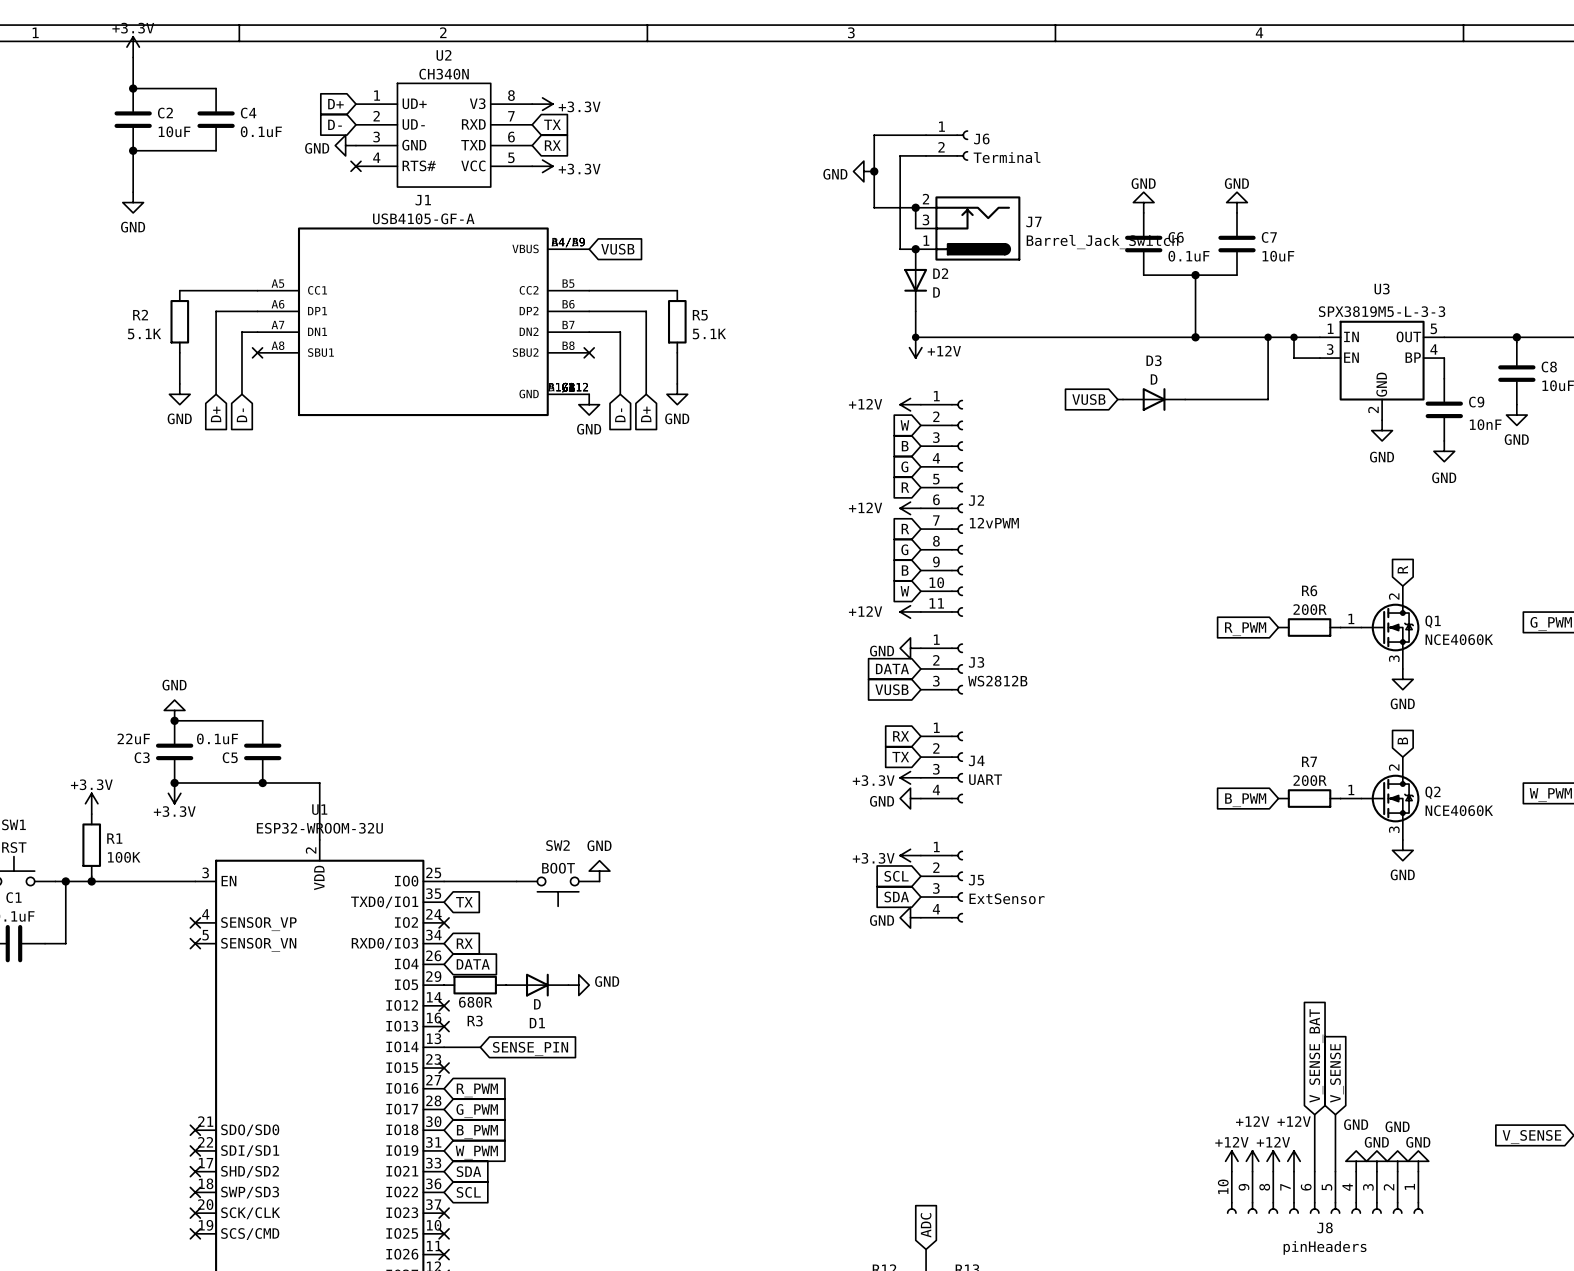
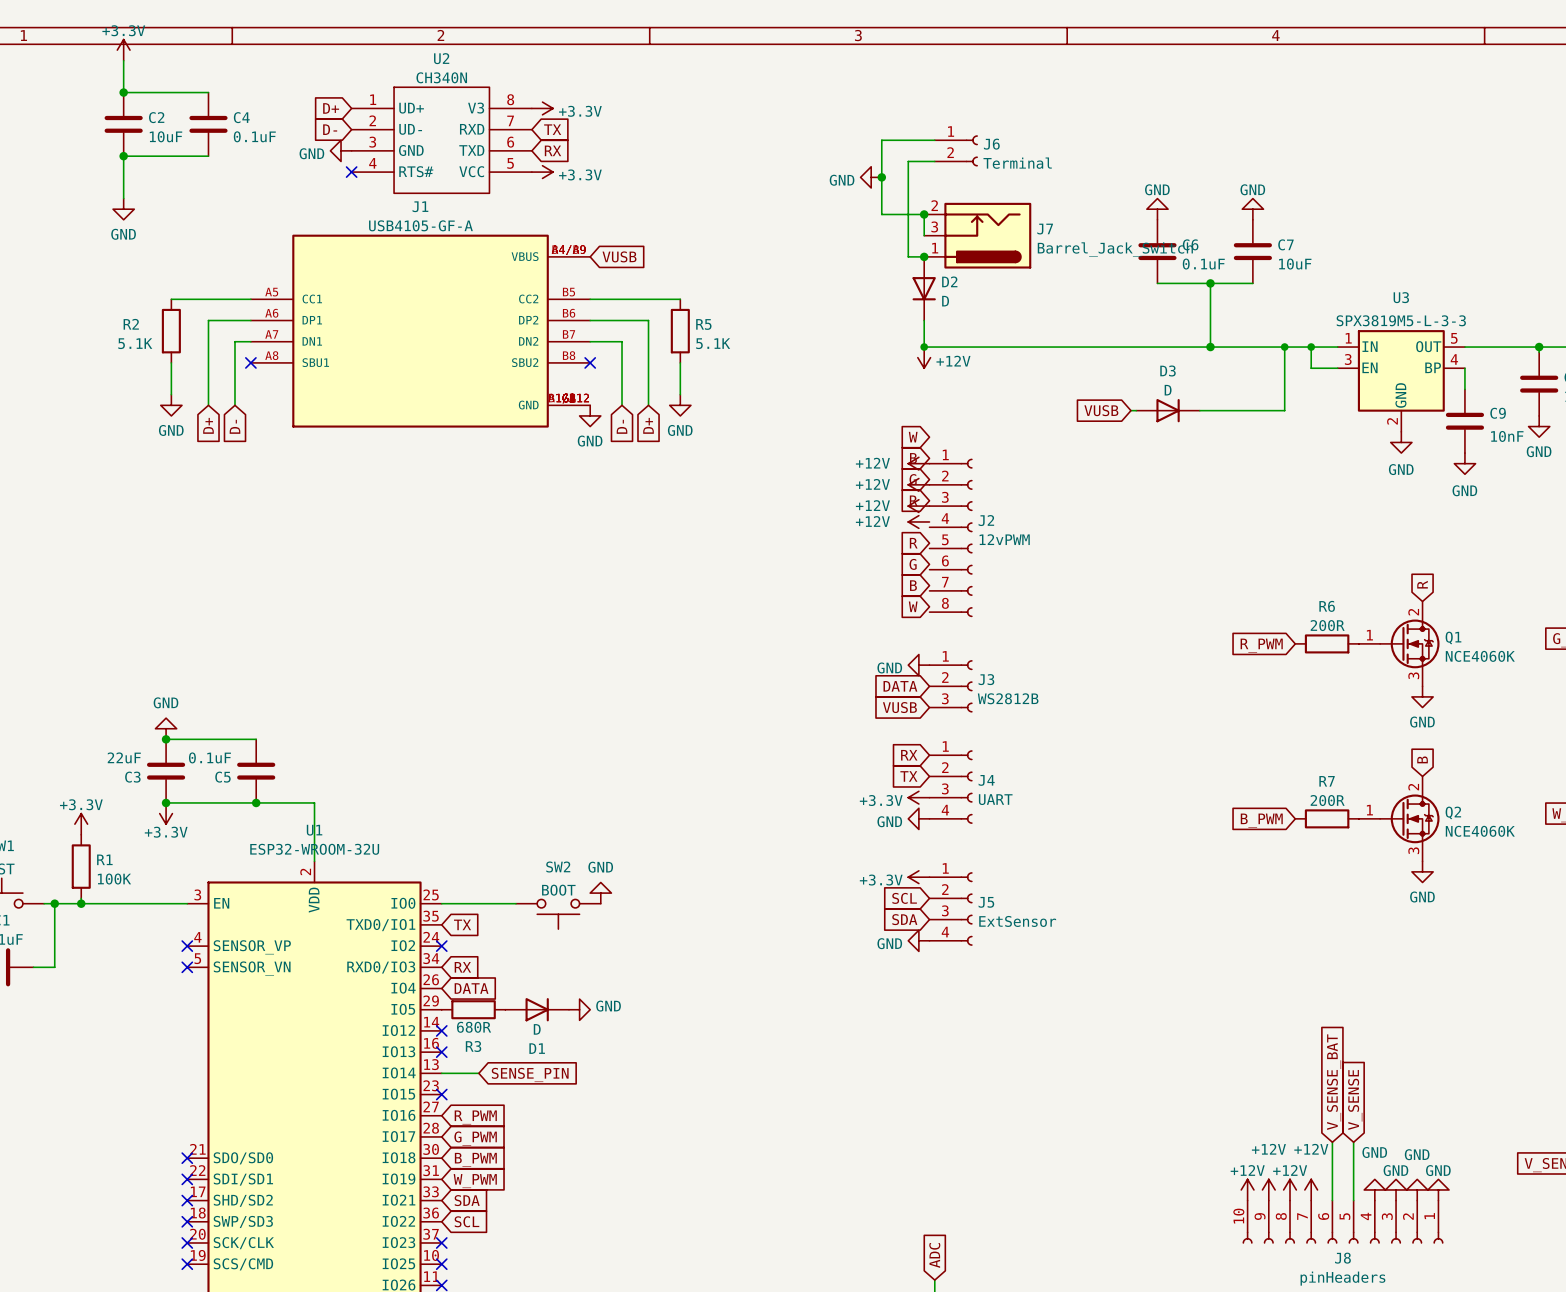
J2 symbol: [920, 399, 963, 617] -> [929, 458, 973, 617]
power symbol: +12V (910, 404) -> none
power symbol: none -> +12V (918, 463)
power symbol: none -> +12V (918, 484)
power symbol: none -> +12V (918, 506)
power symbol: +12V (910, 611) -> none

